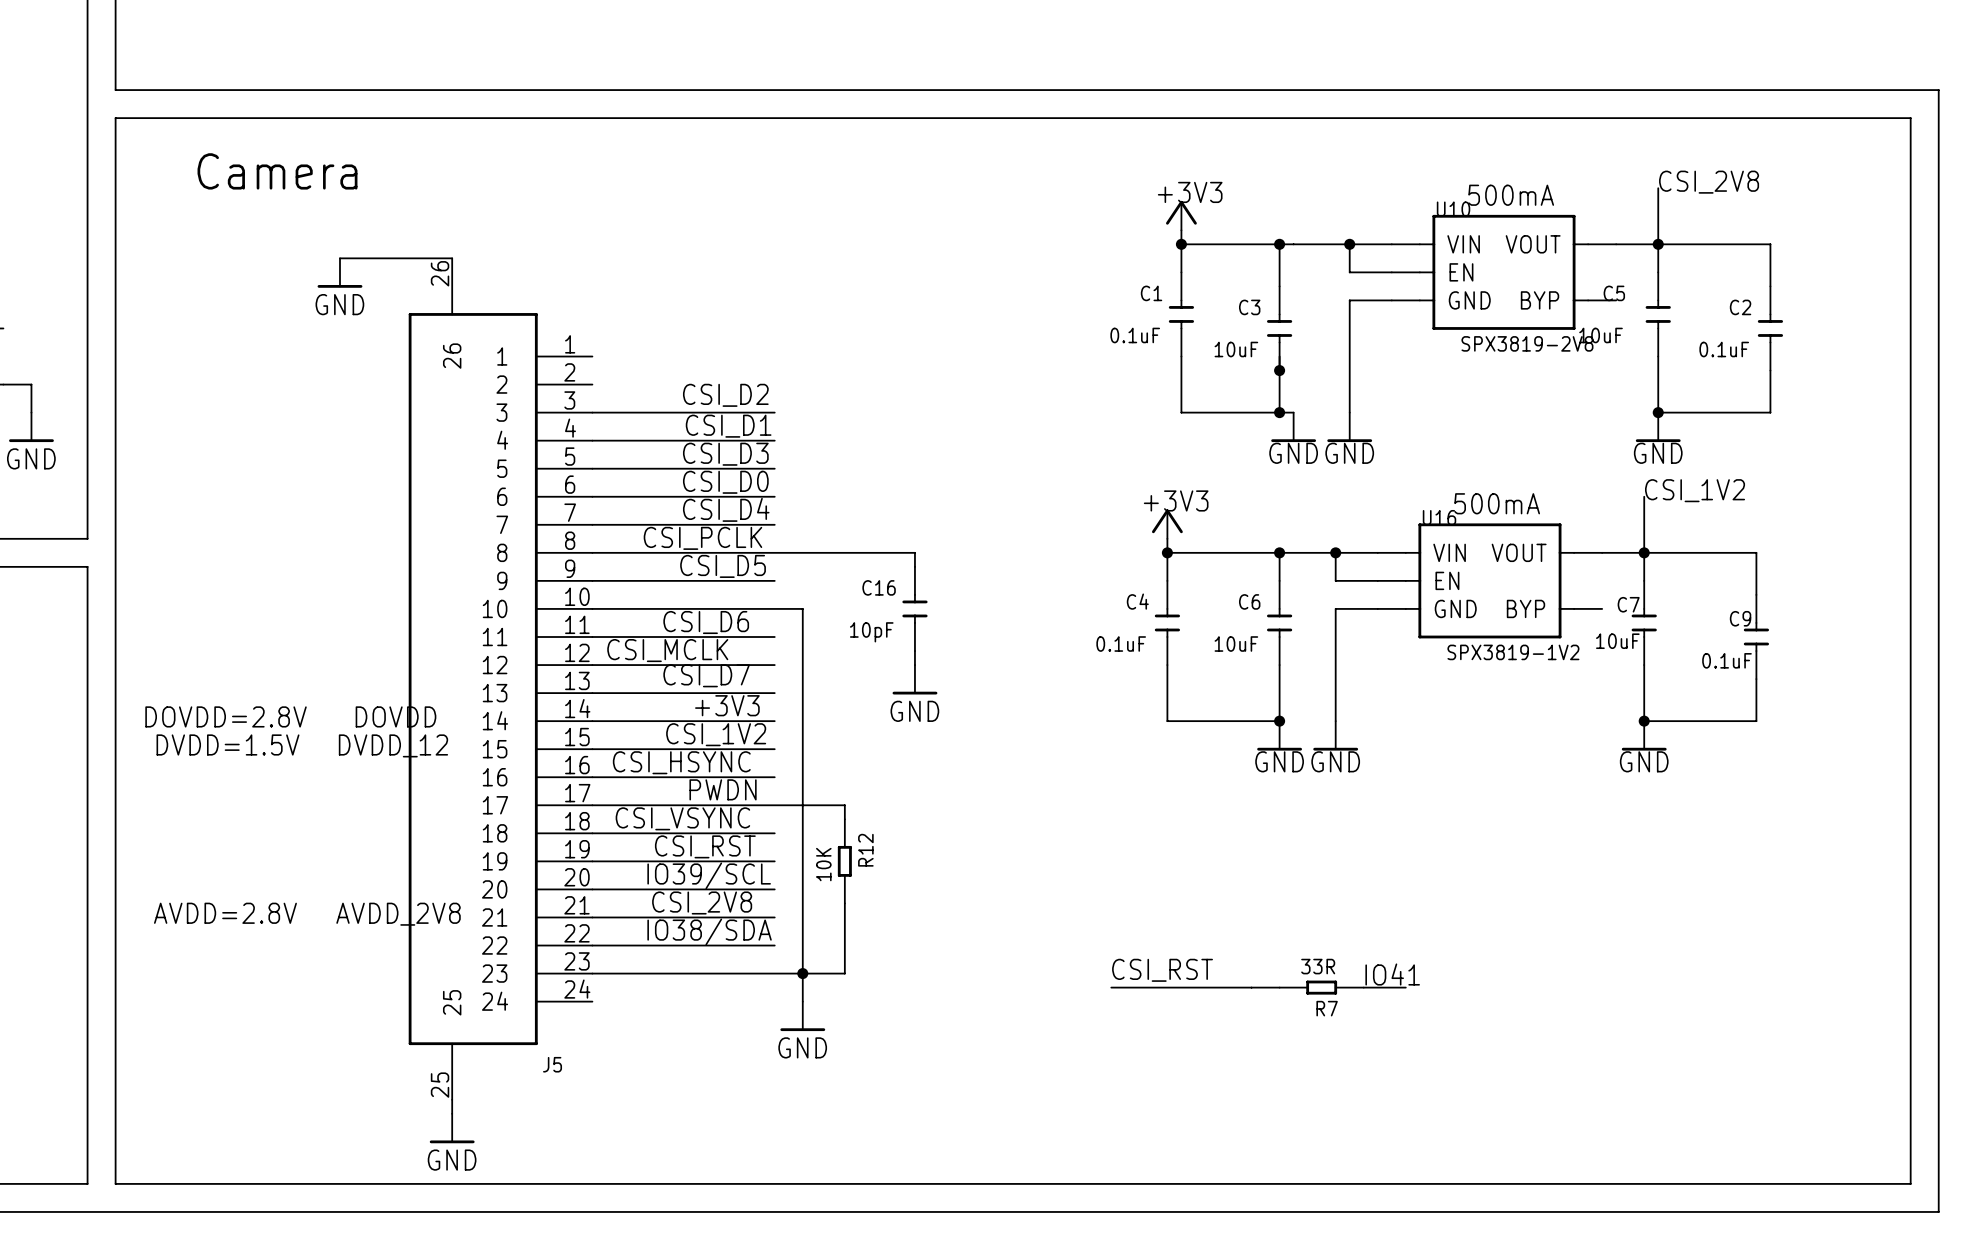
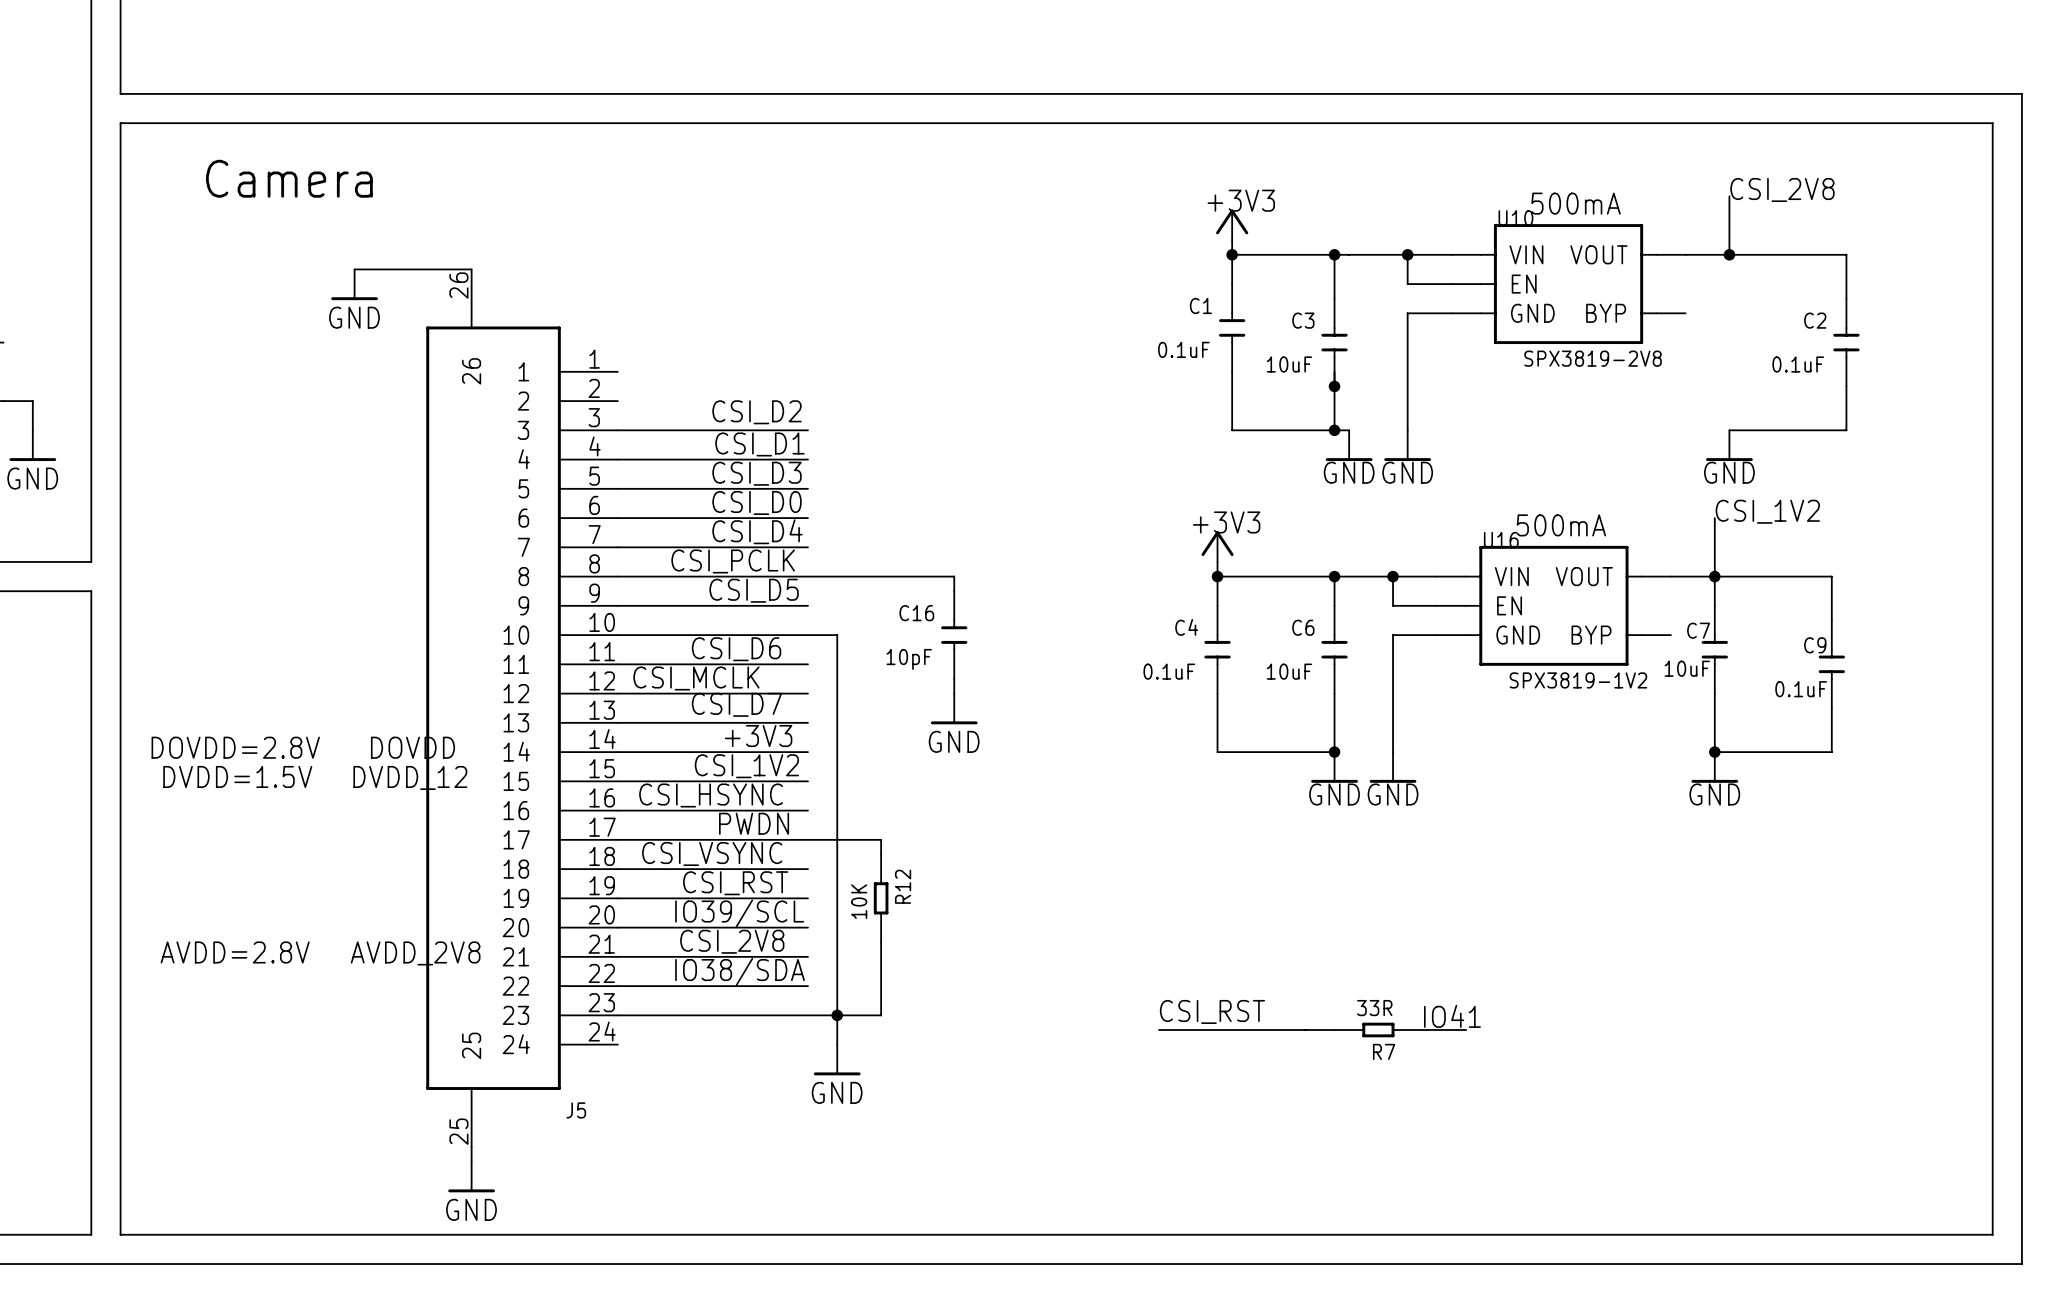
wire: (1658, 244) (1658, 272) -> none
C5: 10uF (1658, 314) -> none
wire: (1658, 356) (1658, 412) -> none
junction: (1658, 412) -> none

